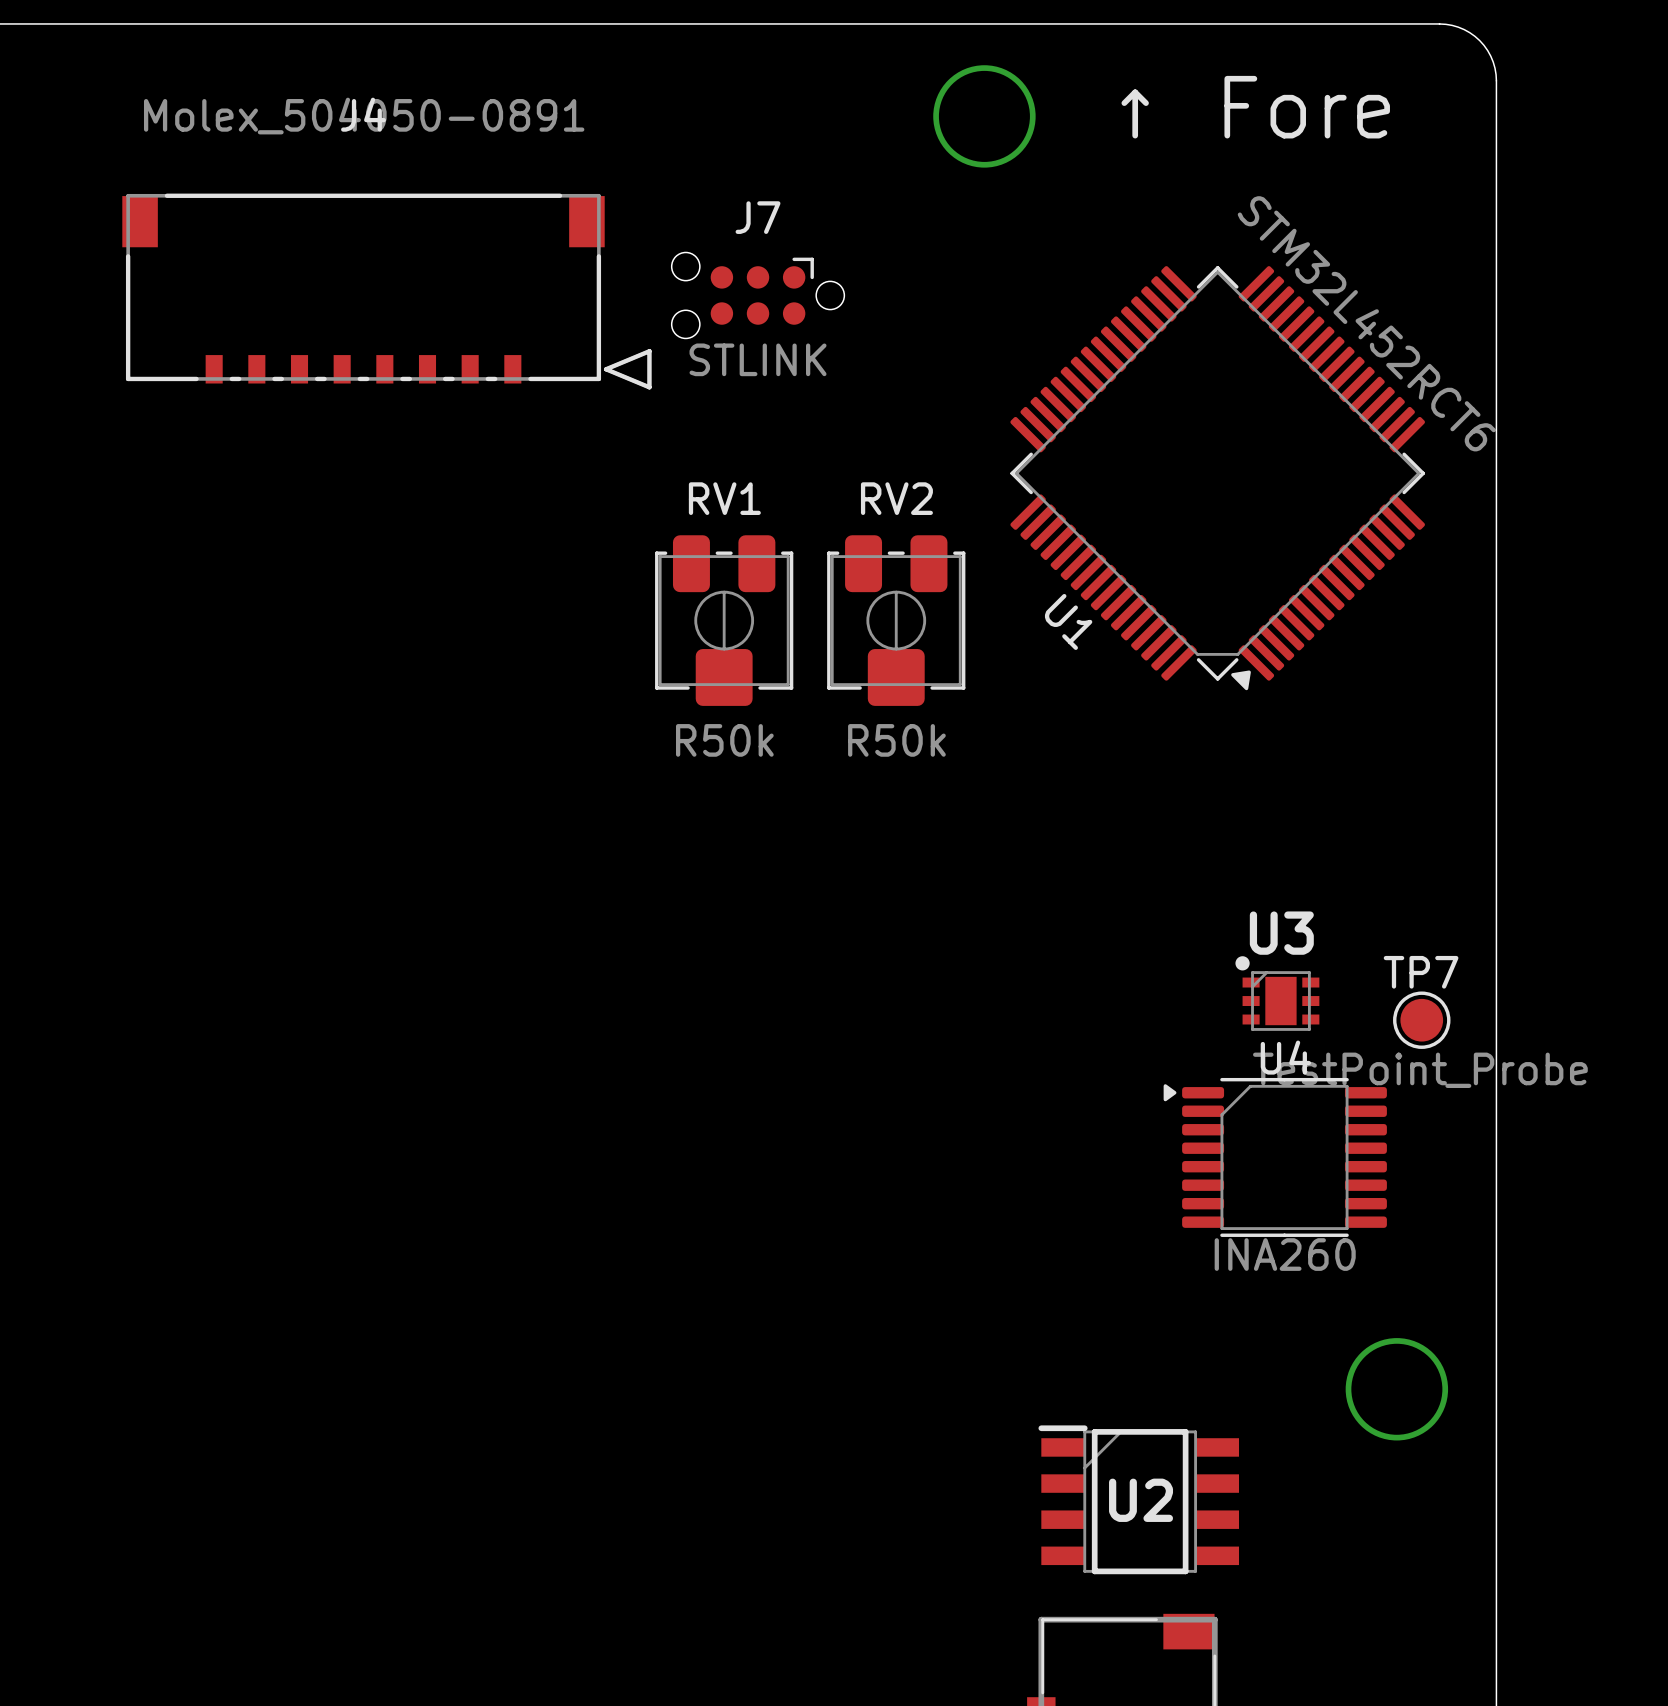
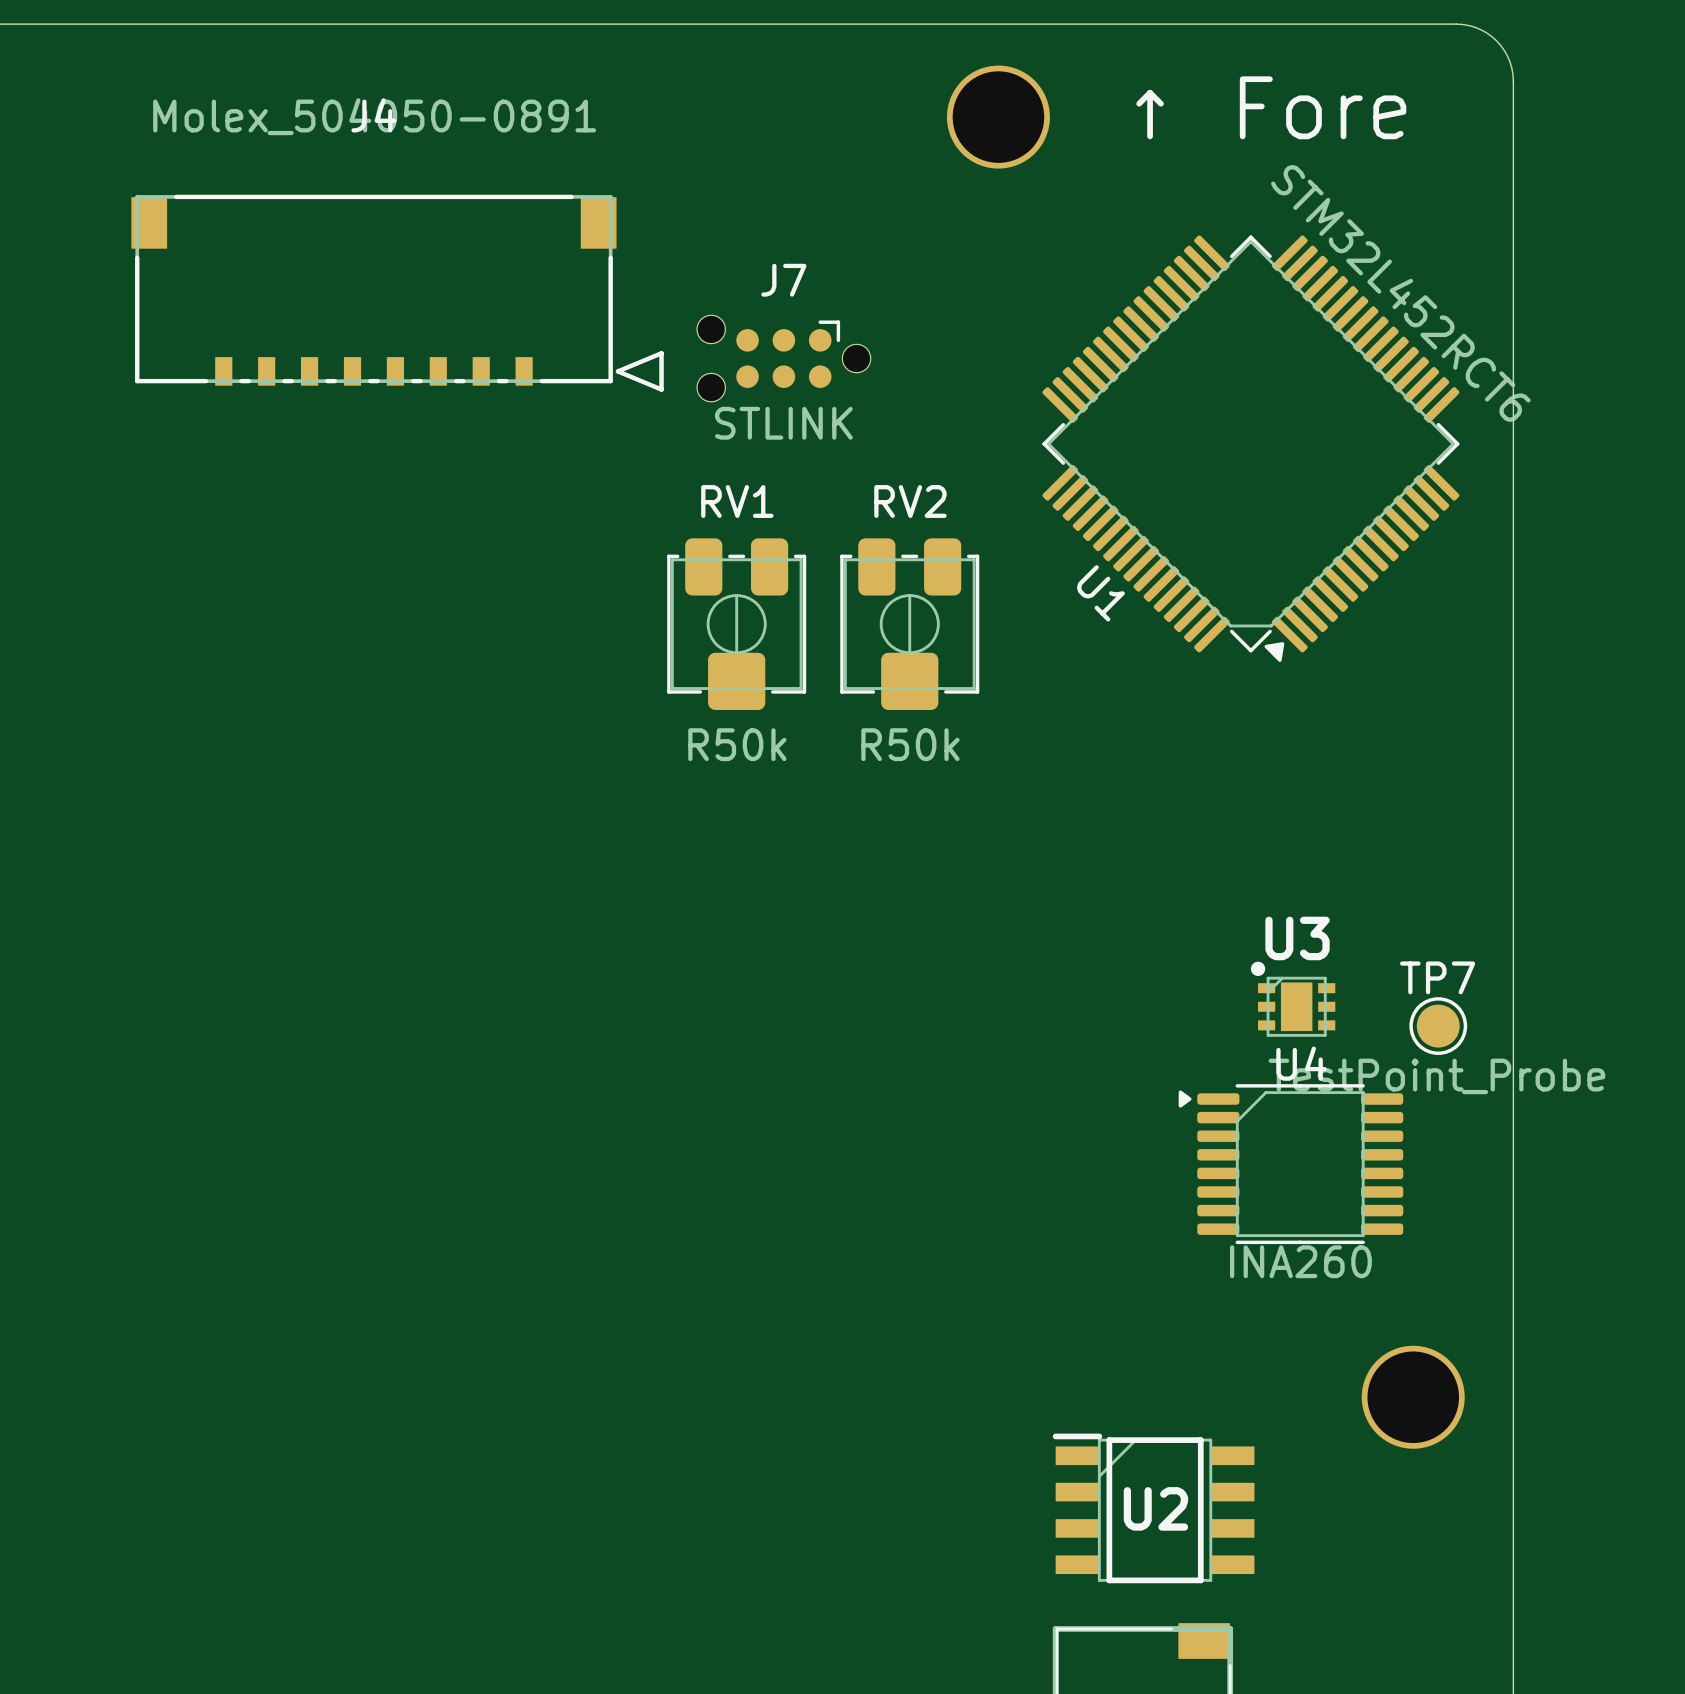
J7 position: (758, 295) -> (783, 358)
U1 position: (1217, 478) -> (1250, 448)

